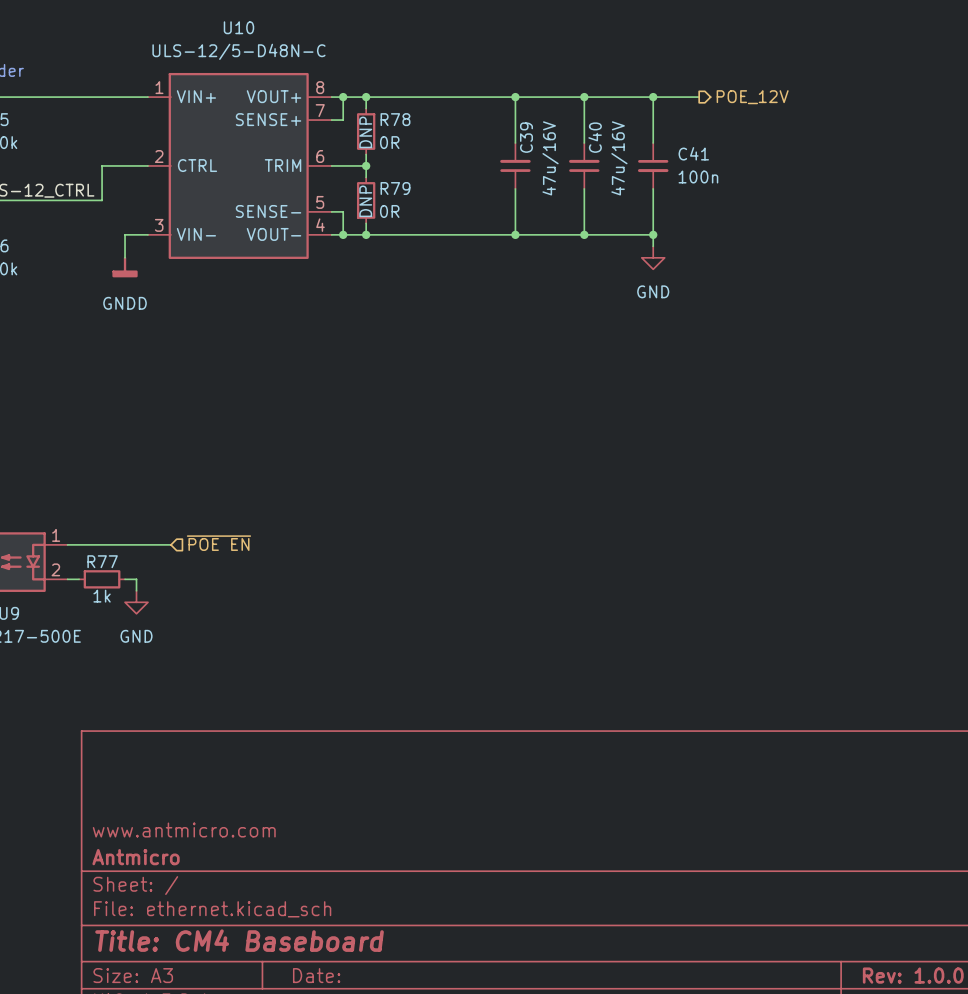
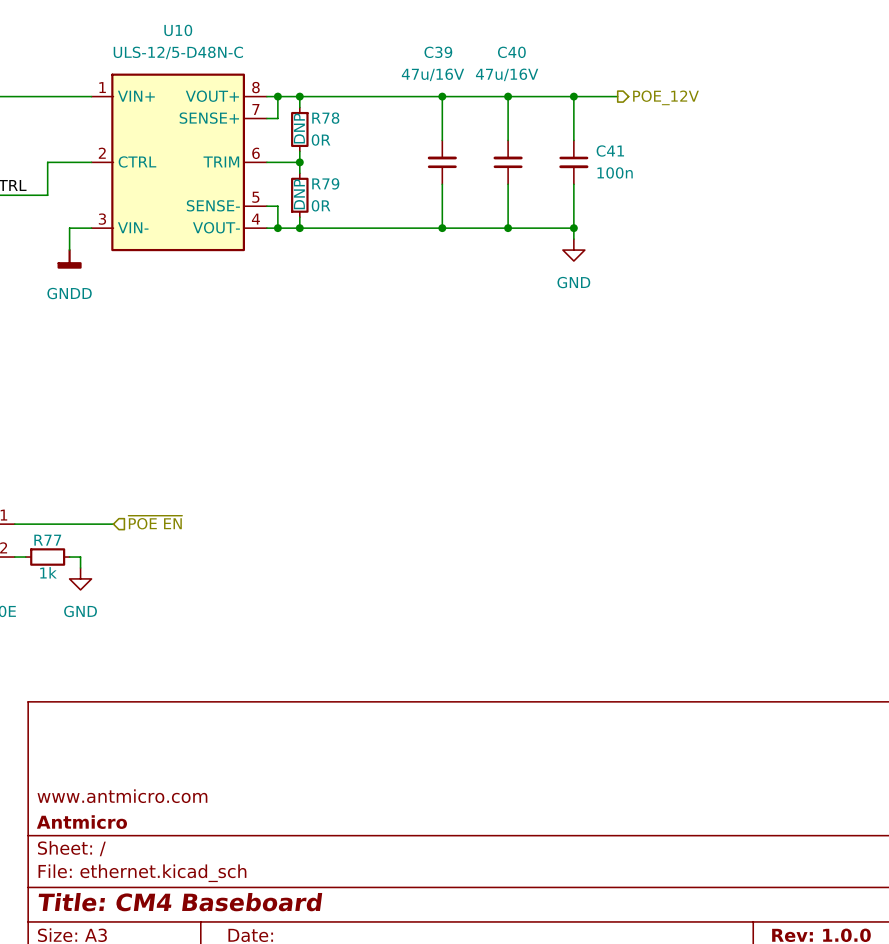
C39 name rotation: 0° (526, 137) -> 90° clockwise (438, 52)
C39 name position: C39 (526, 137) -> C39 (438, 52)
C40 name rotation: 0° (595, 137) -> 90° clockwise (511, 52)
C40 name position: C40 (595, 137) -> C40 (511, 52)
C39 text rotation: 0° (550, 158) -> 90° clockwise (432, 74)
C39 text position: 47u/16V (550, 158) -> 47u/16V (432, 74)
C40 text rotation: 0° (619, 158) -> 90° clockwise (507, 74)
C40 text position: 47u/16V (619, 158) -> 47u/16V (507, 74)

